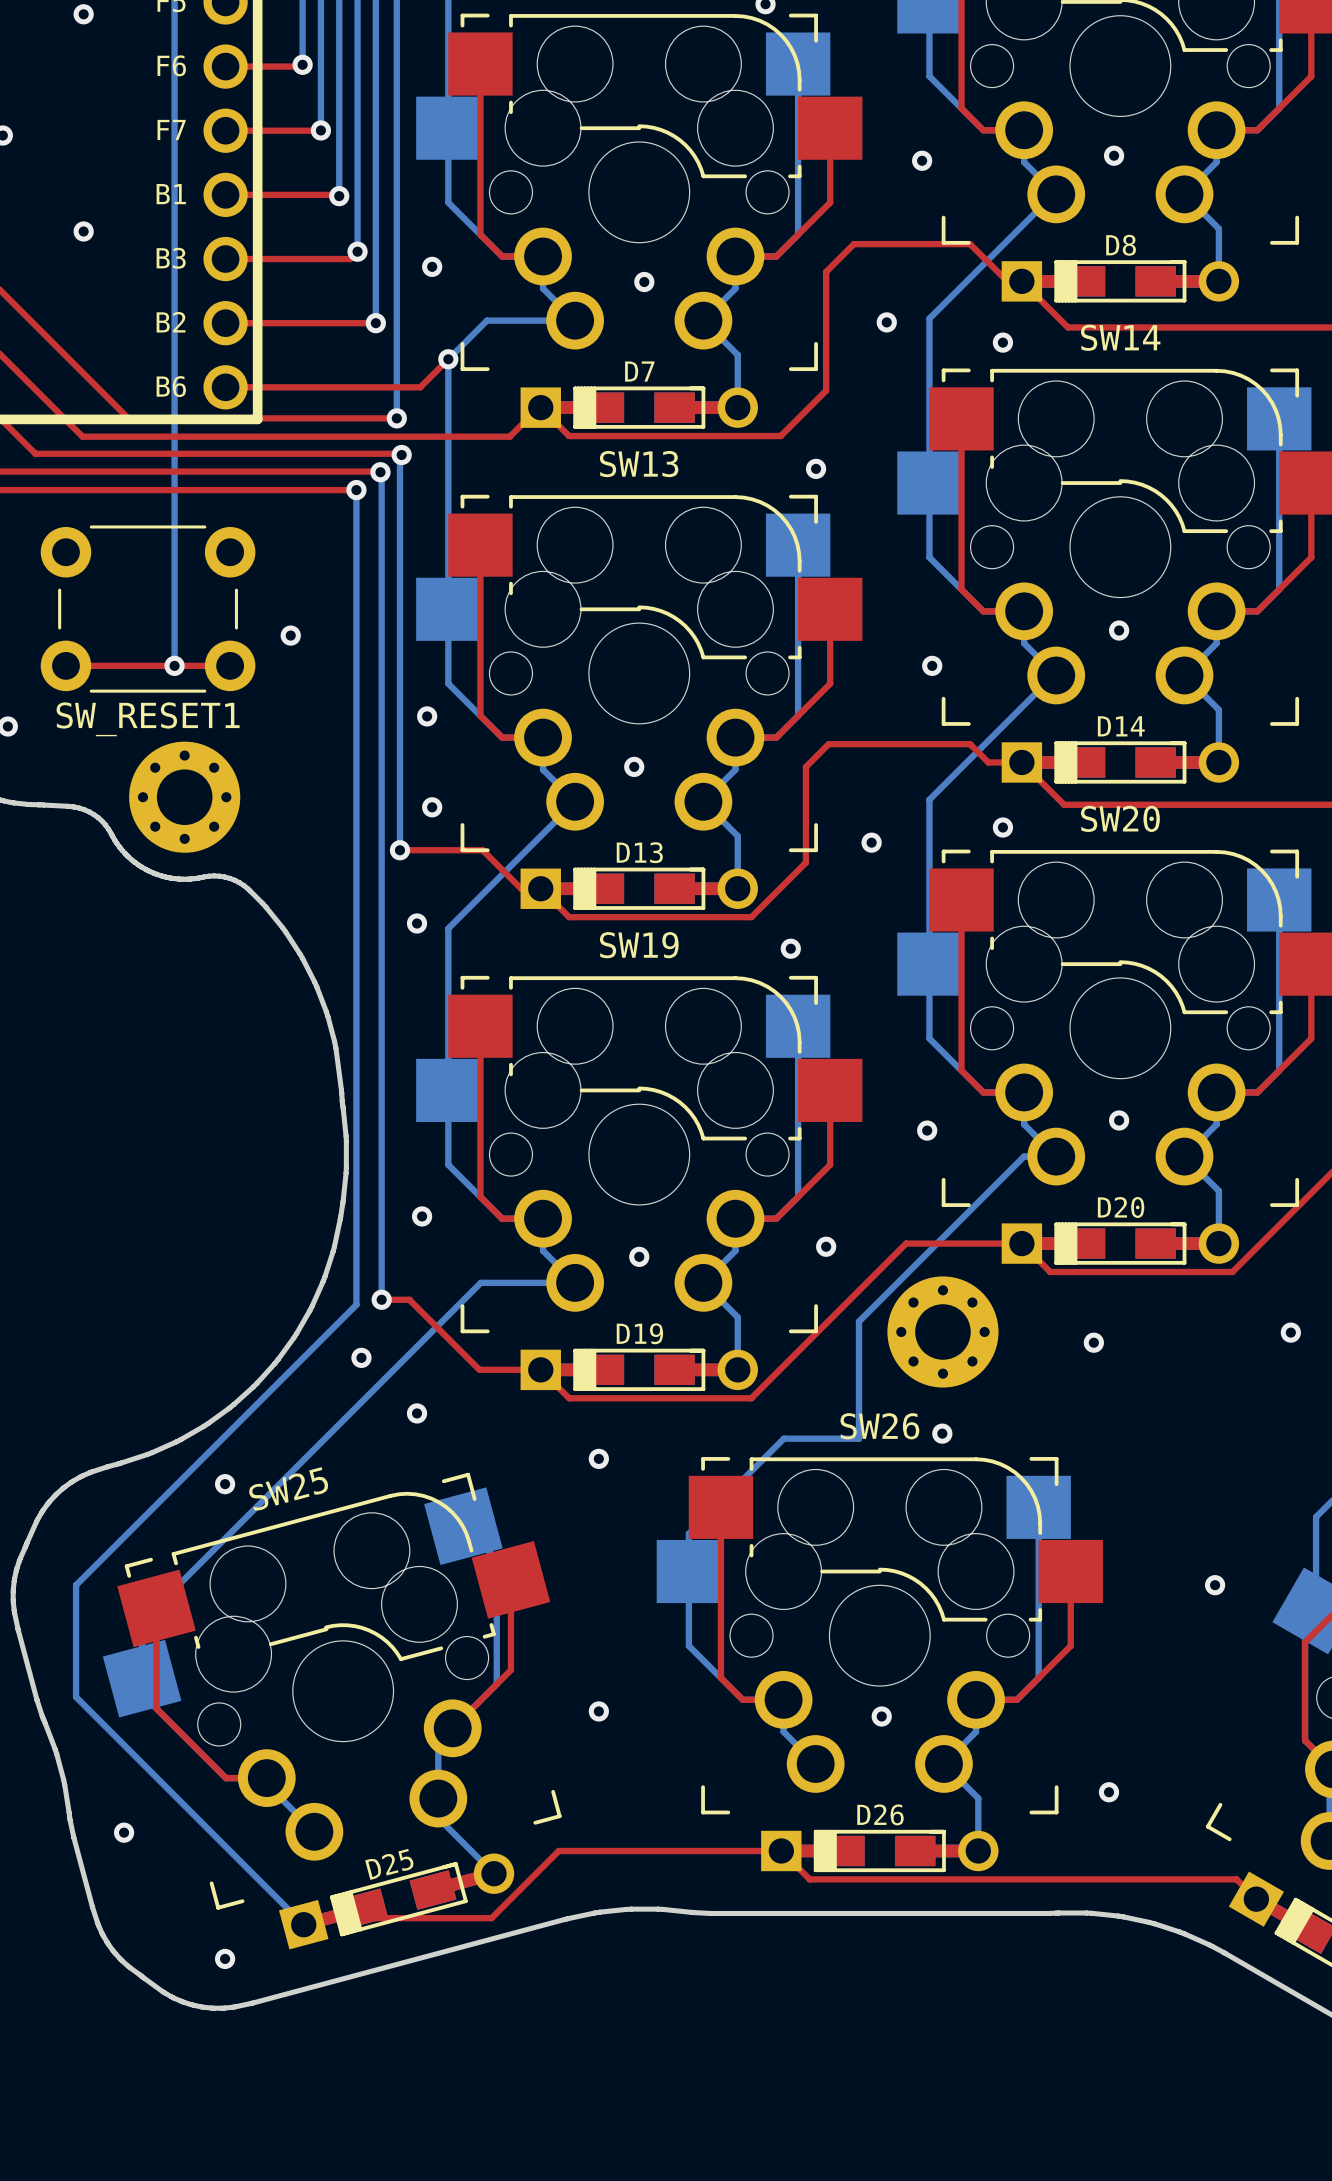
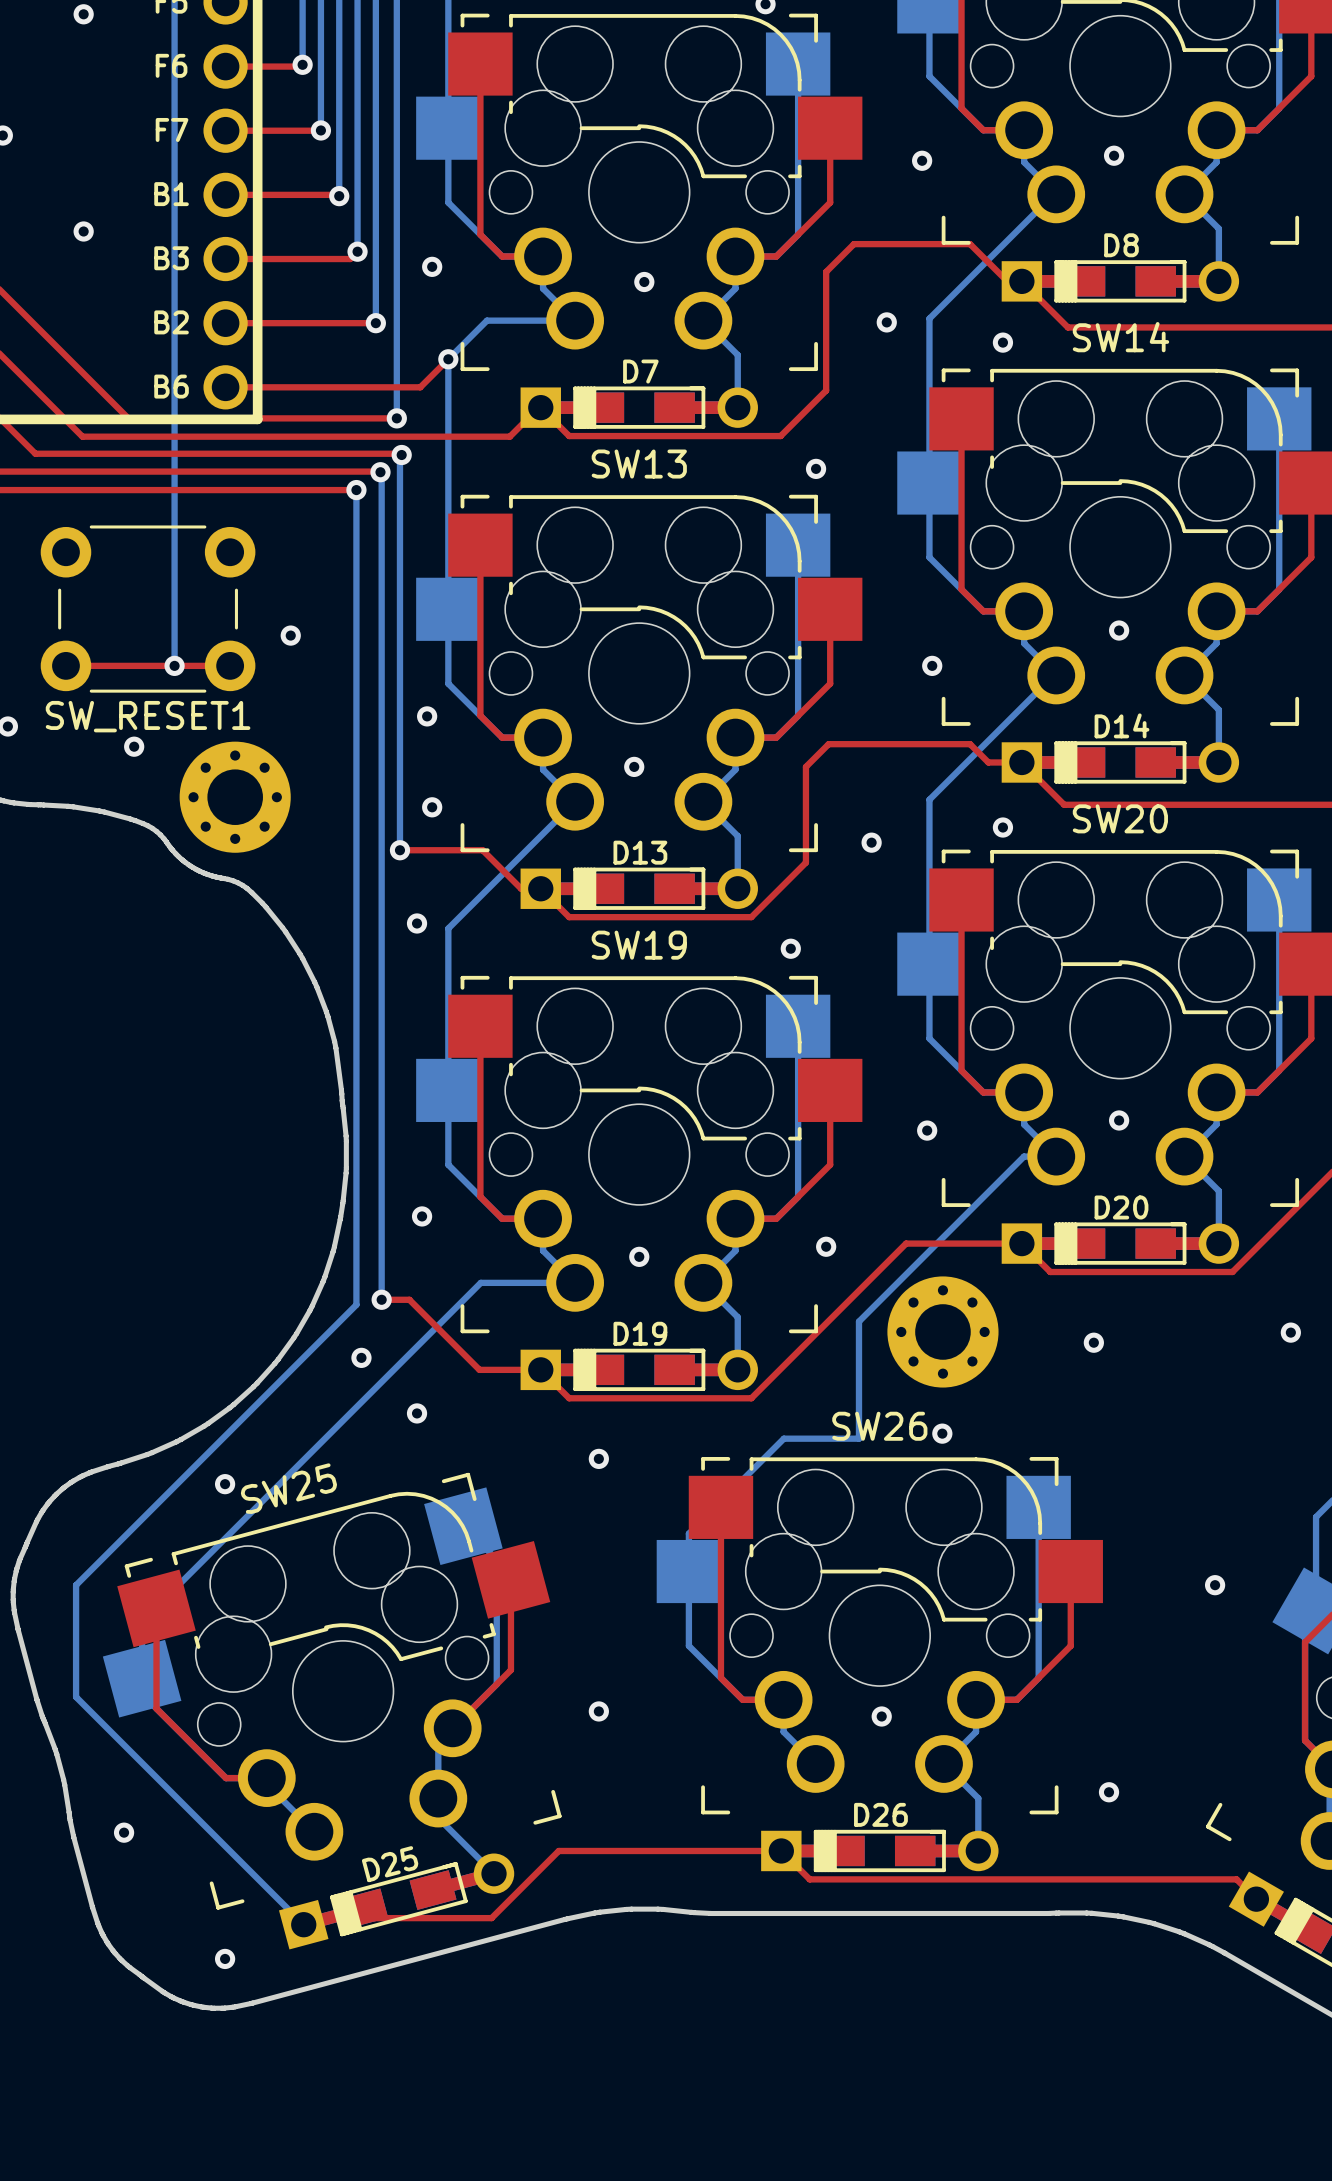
via: none -> (134, 746)
part position: (184, 797) -> (235, 797)
board edge: (73, 806) (84, 809) (98, 817) (125, 853) (148, 870) (178, 878) (214, 875) (224, 877) (239, 882) (251, 892) -> (73, 806) (104, 812) (147, 825) (160, 835) (176, 854) (191, 866) (207, 874) (237, 882) (251, 892)

